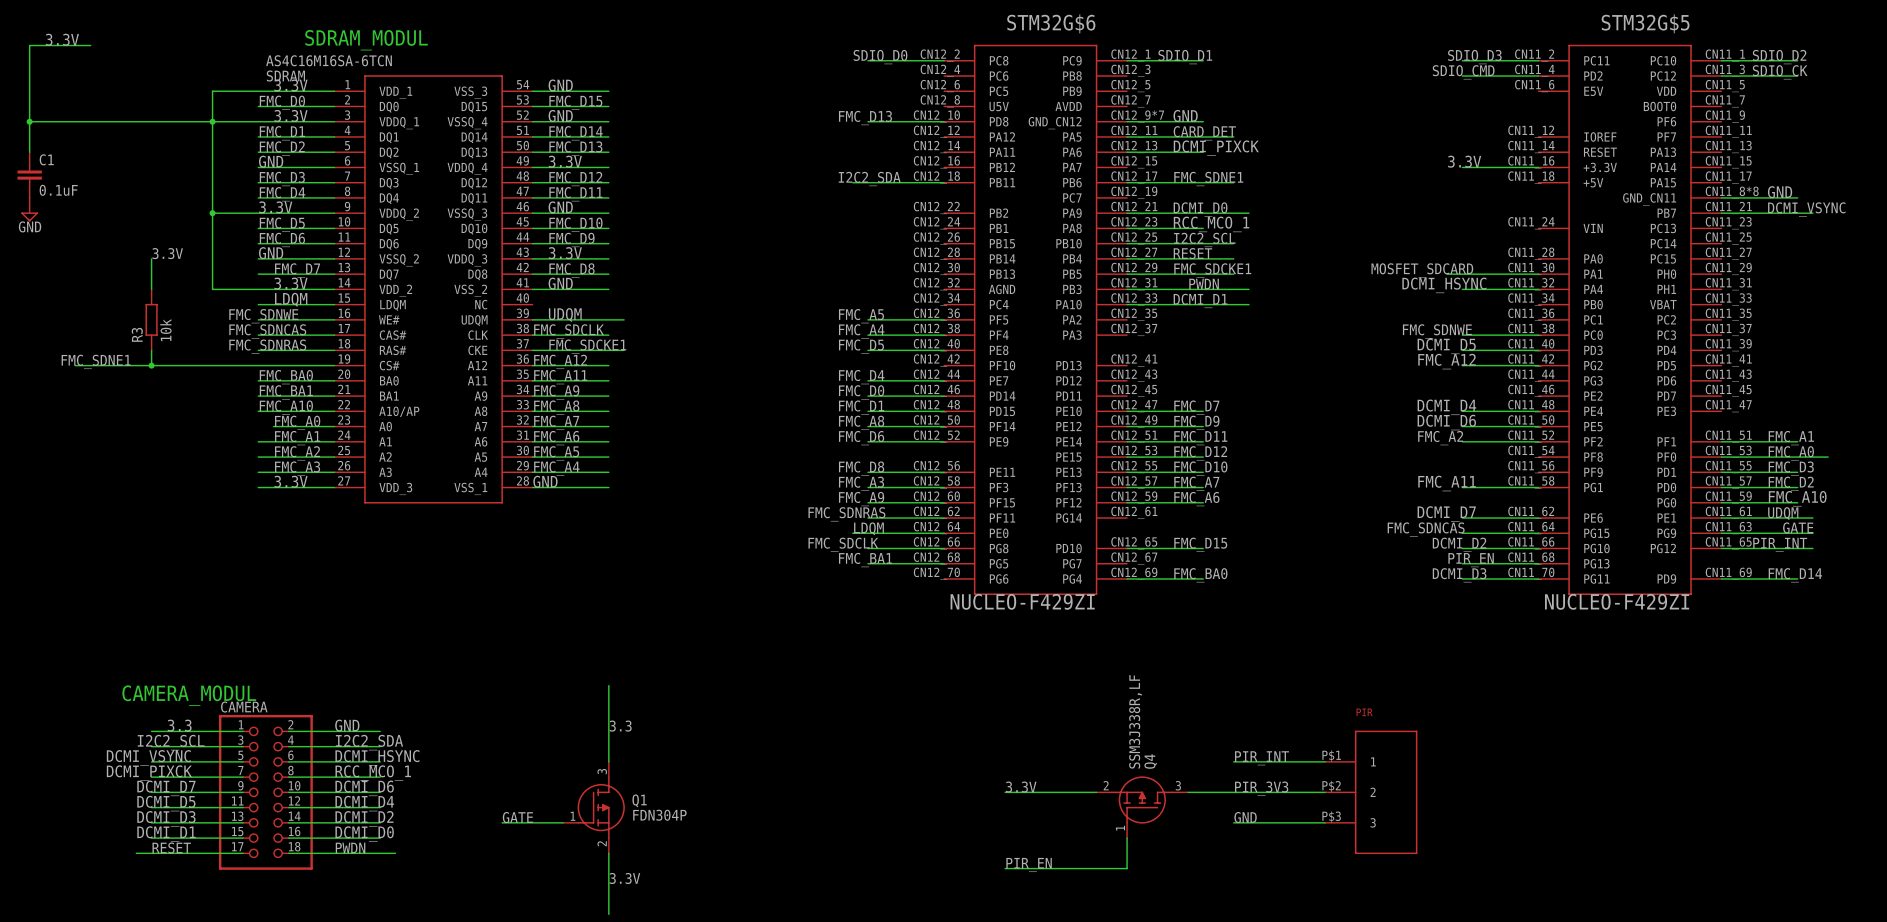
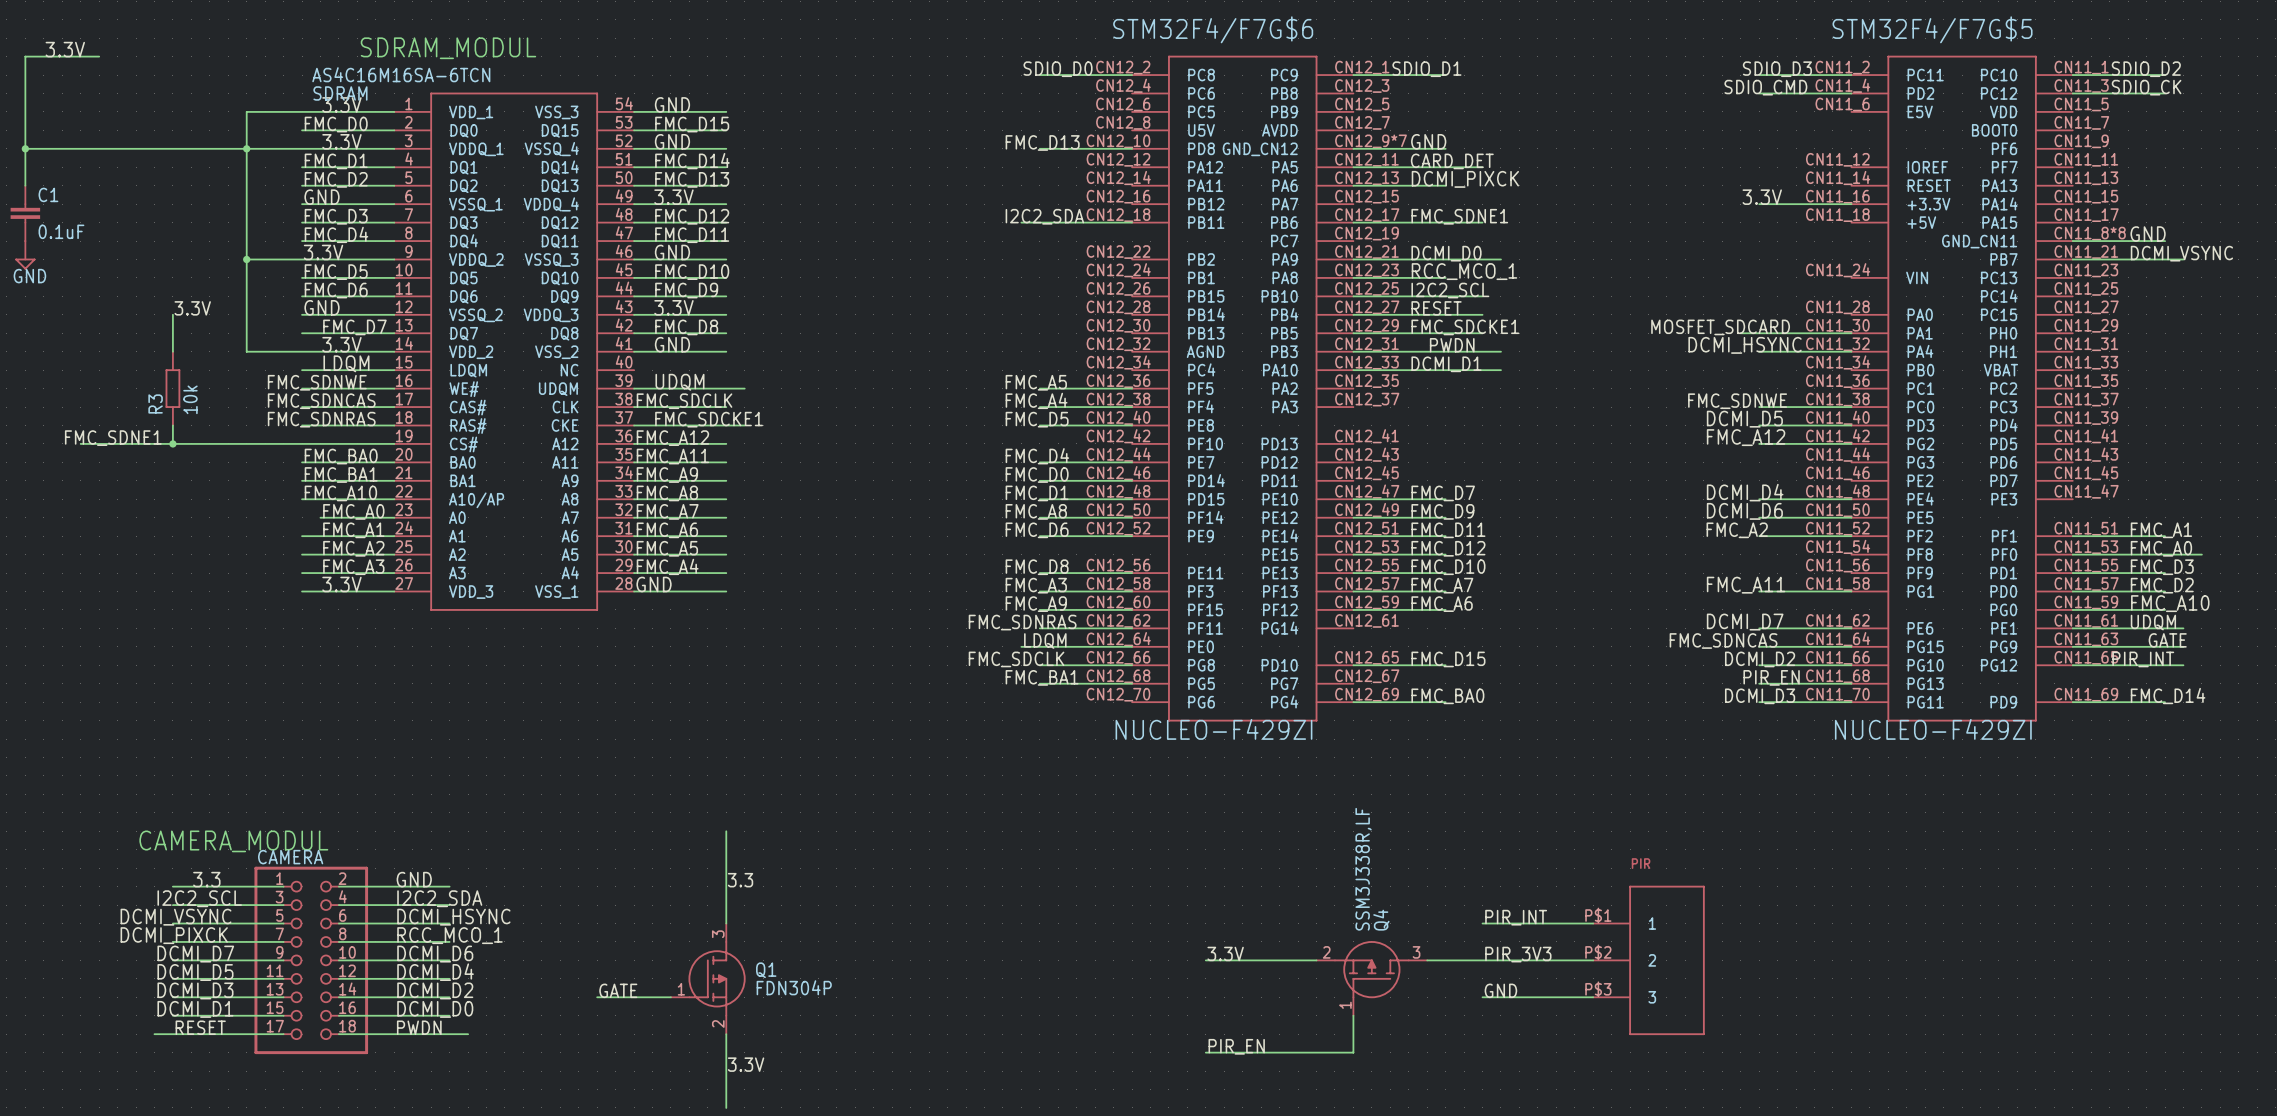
STM32G$6 name: STM32G$6 (1051, 23) -> STM32F4/F7G$6 (1213, 29)
STM32G$5 name: STM32G$5 (1645, 23) -> STM32F4/F7G$5 (1932, 29)

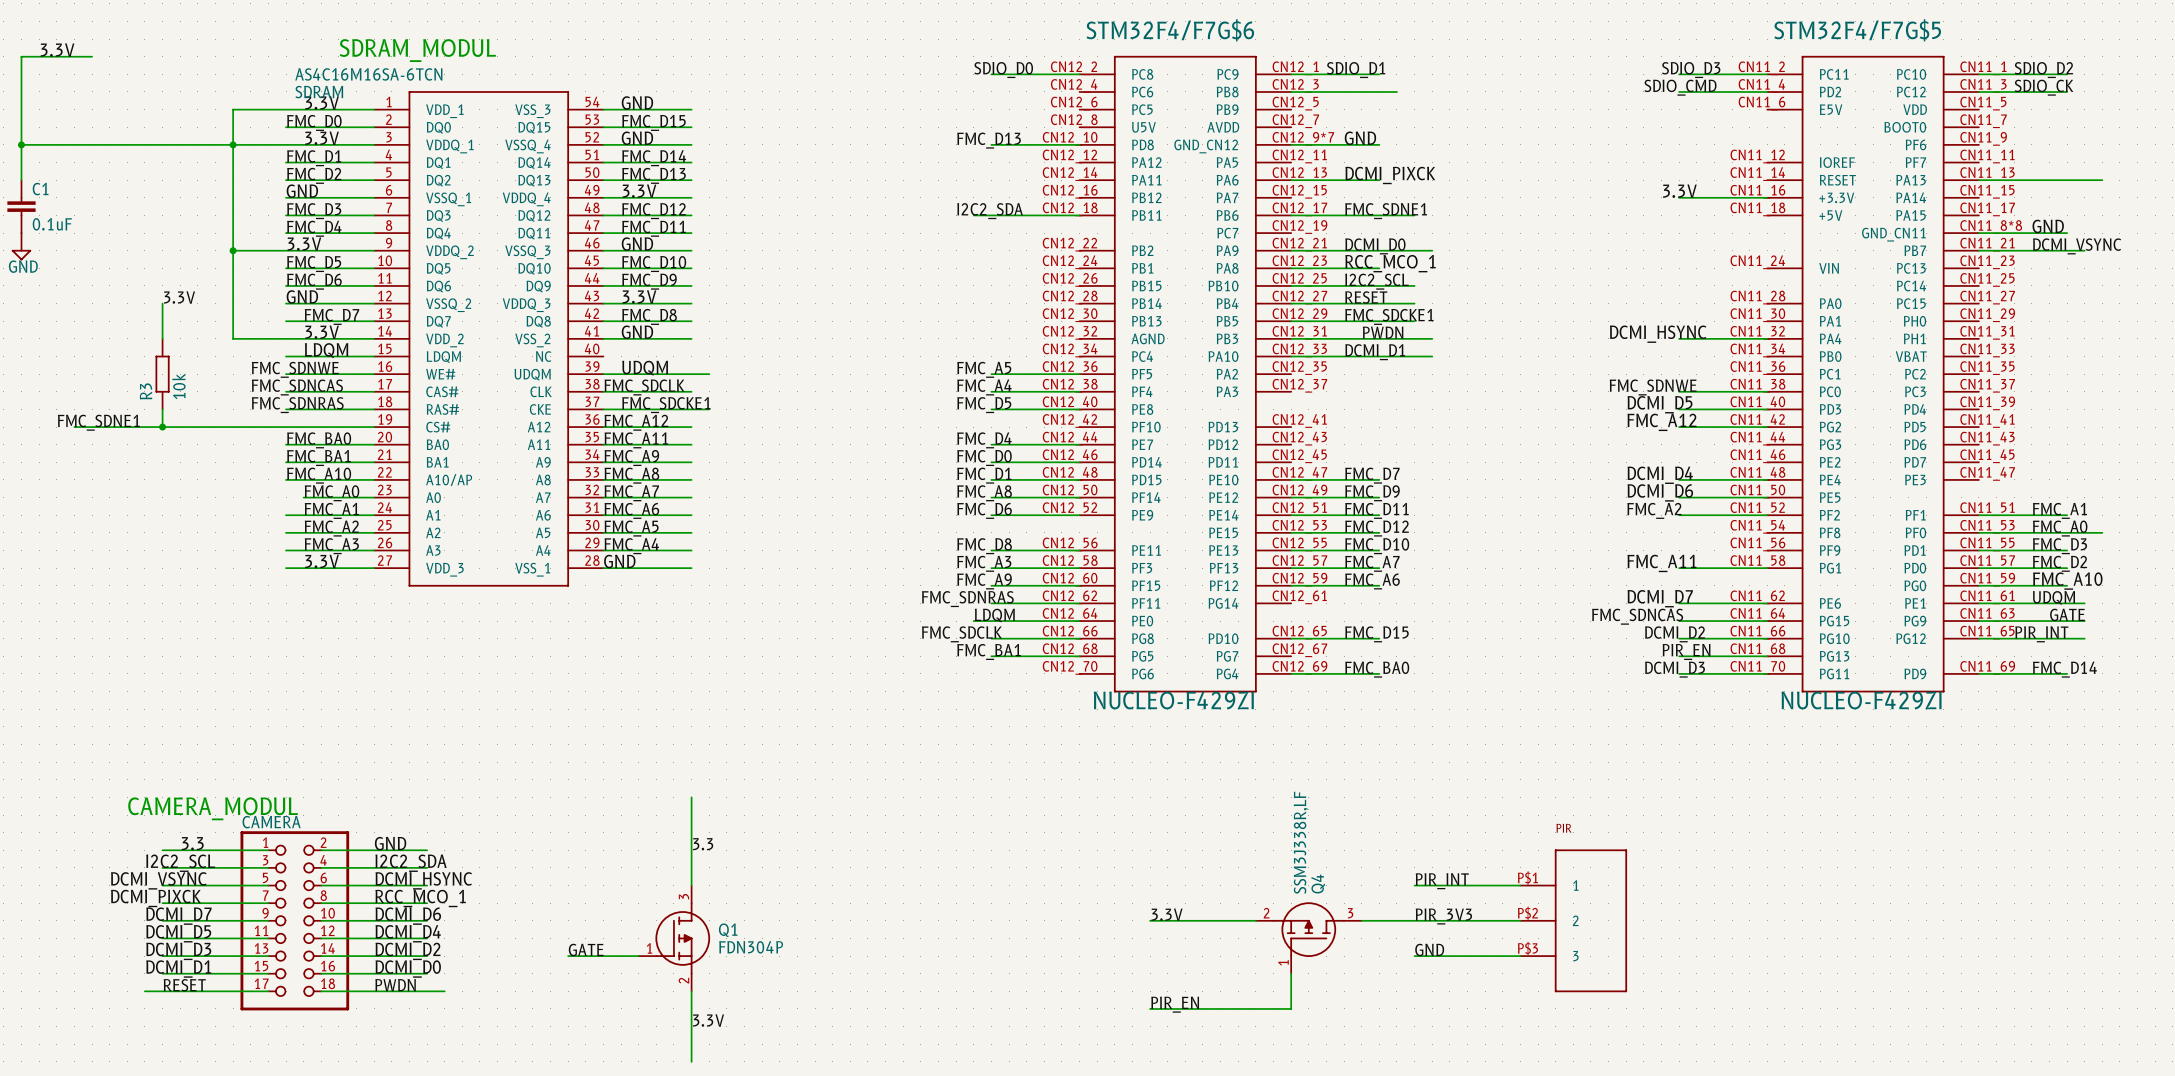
wire: none -> (1291, 91) (1396, 91)
label: CARD_DET (1452, 161) -> none
wire: (1353, 167) (1482, 167) -> none
wire: none -> (1978, 180) (2102, 180)
label: MOSFET_SDCARD (1720, 327) -> none
wire: (1740, 333) (1851, 333) -> none

